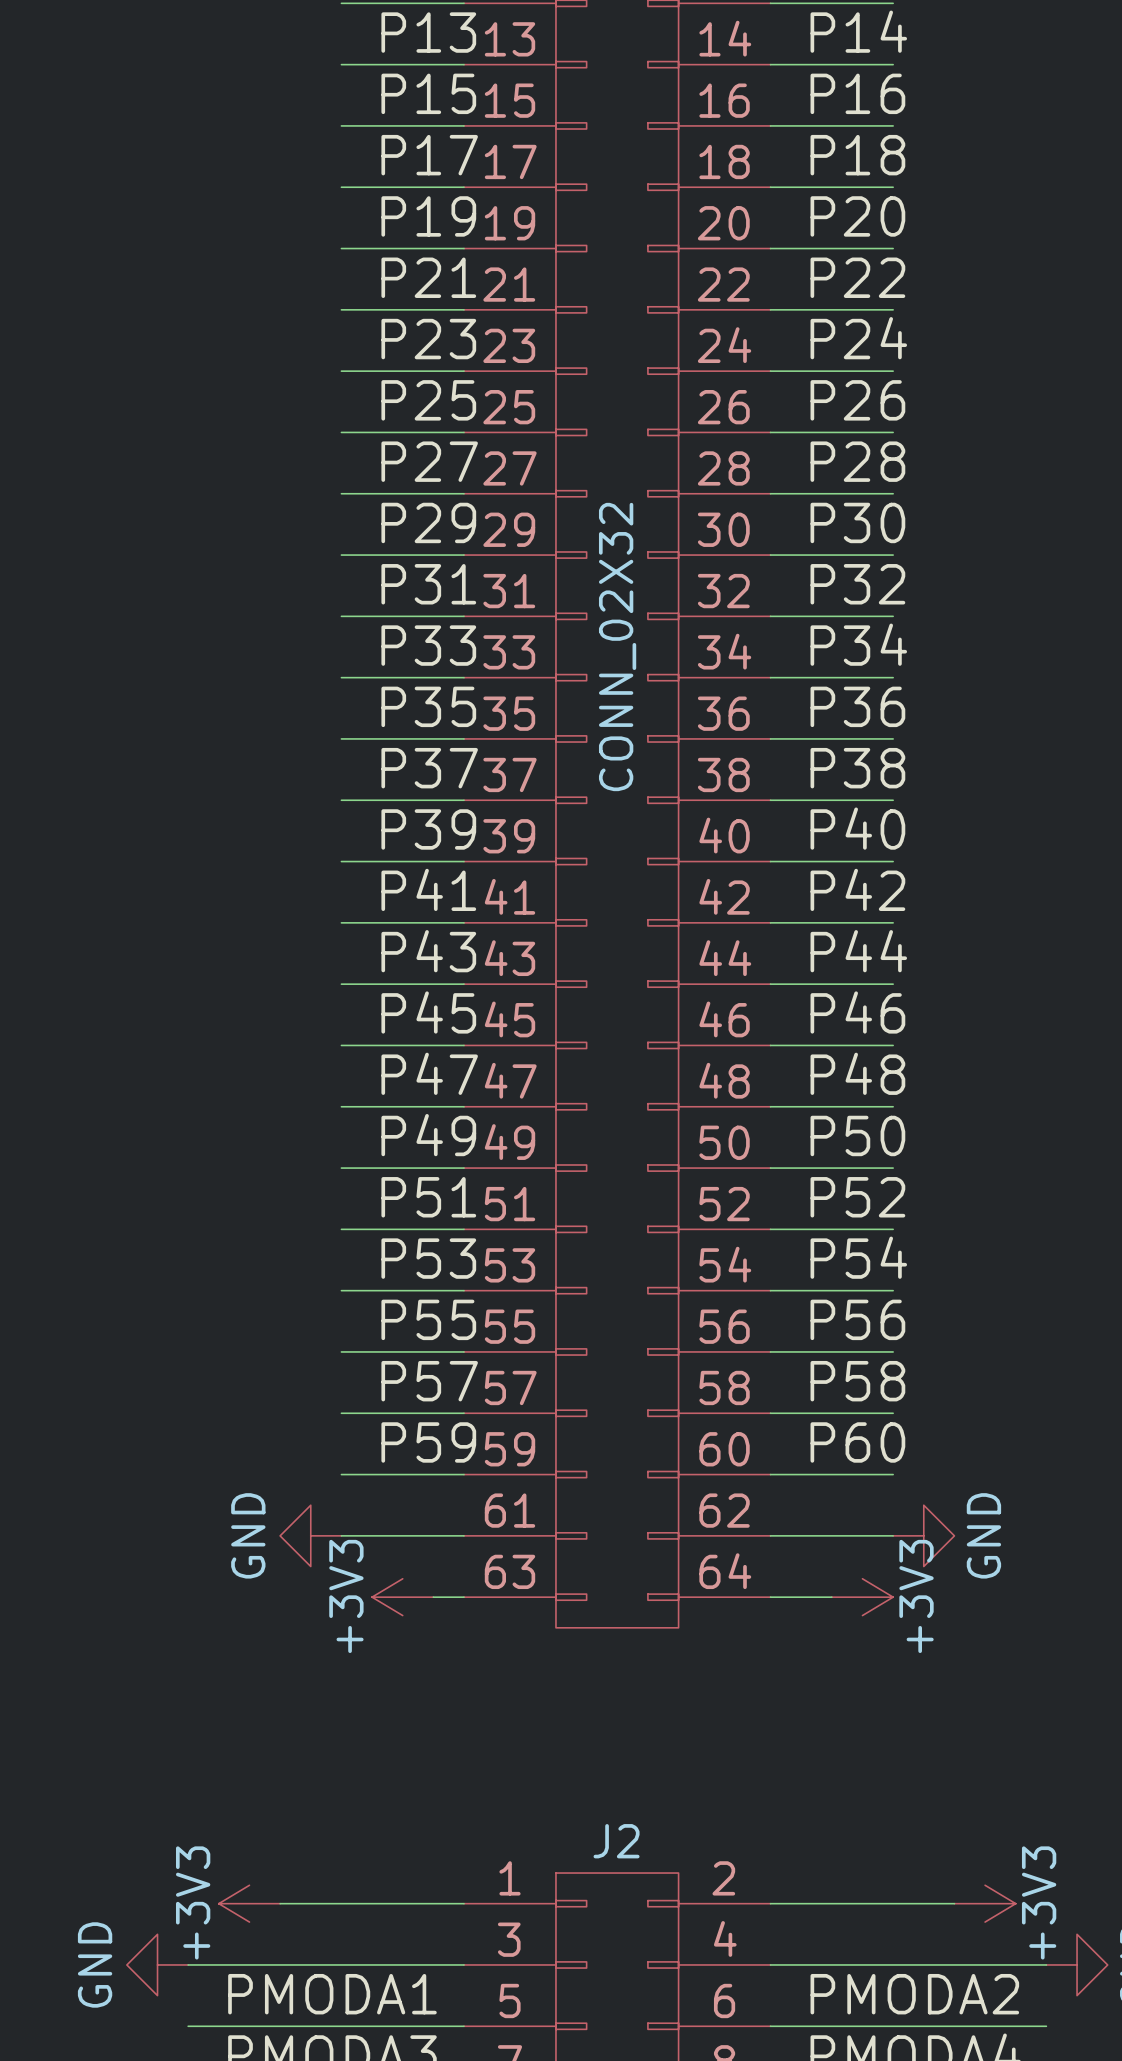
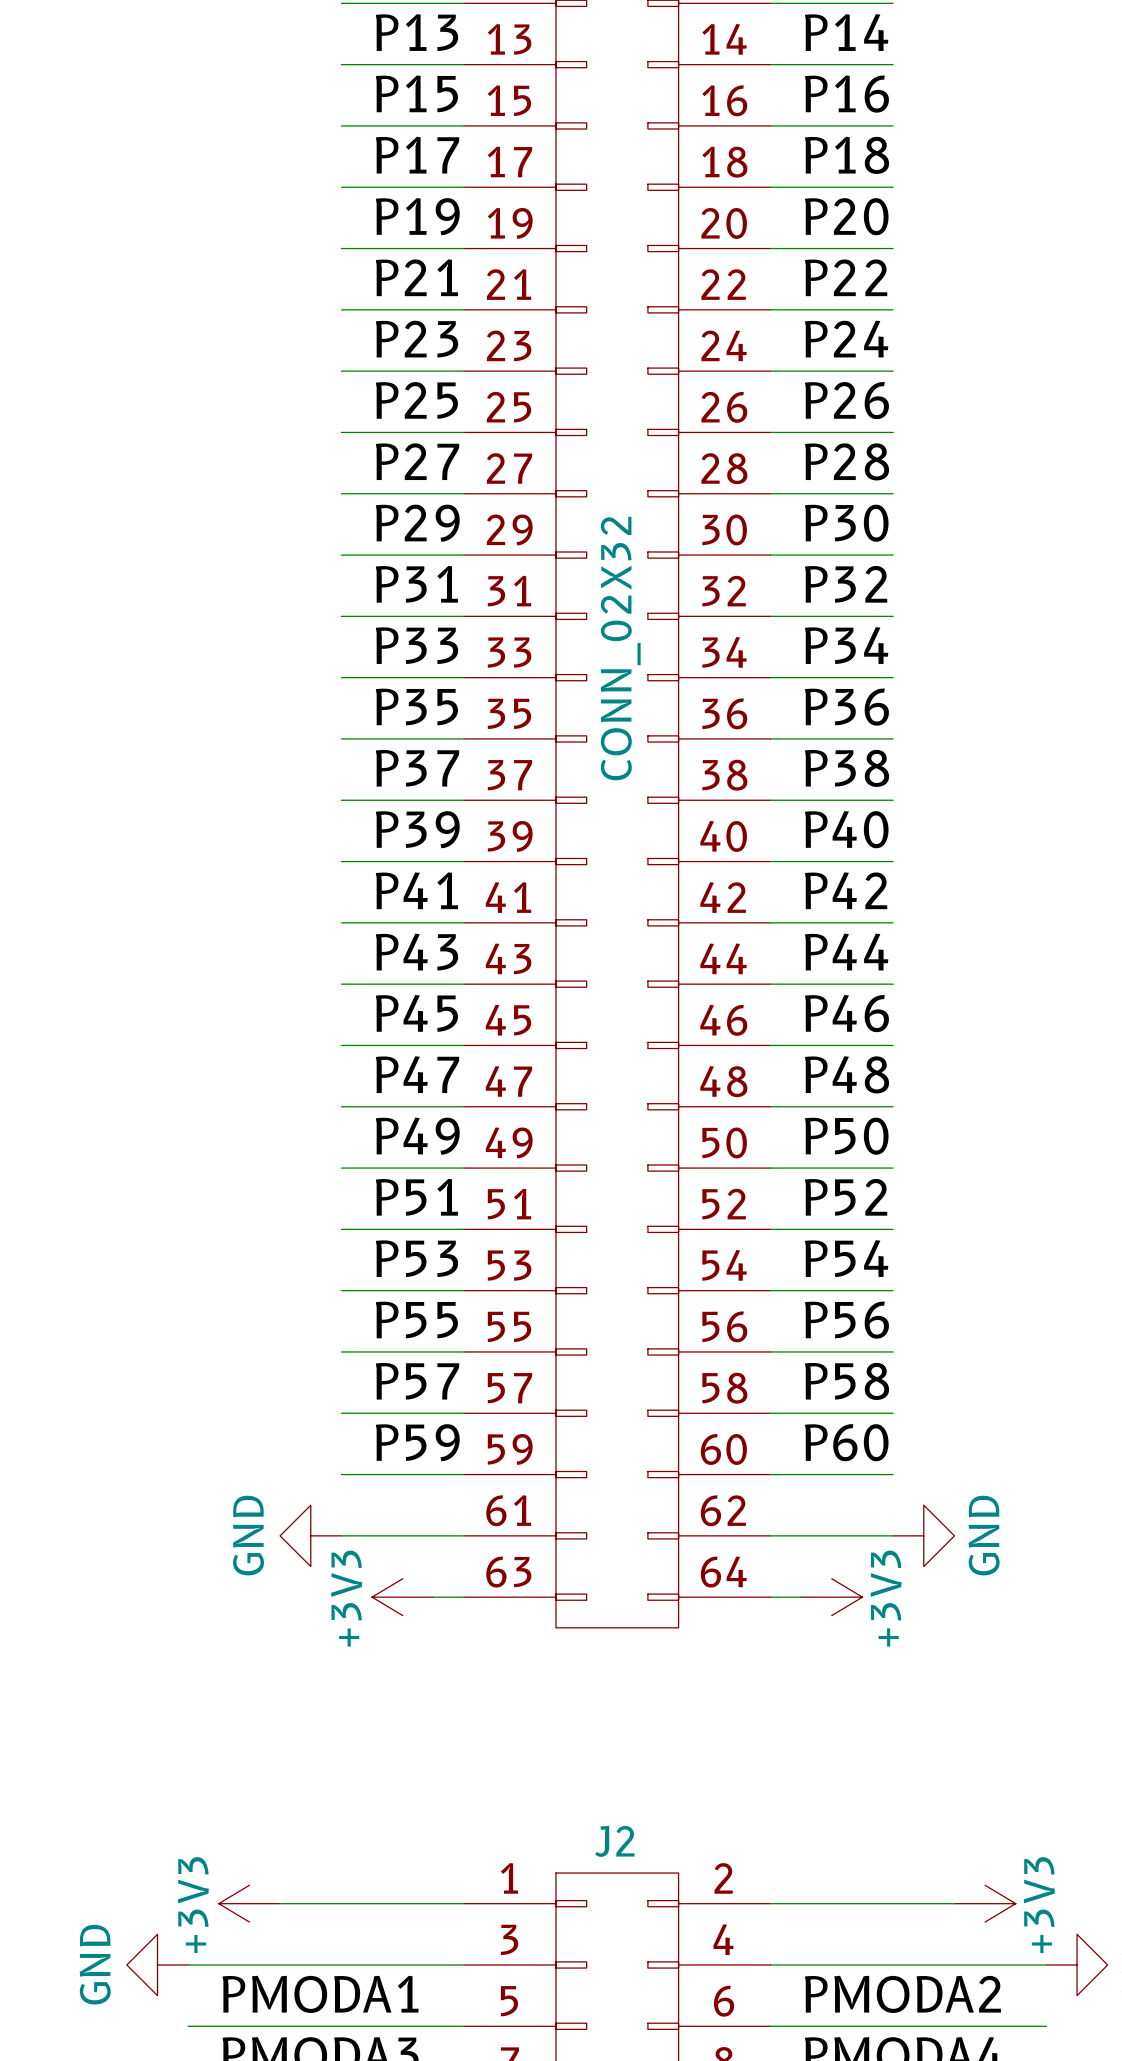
power symbol position: +3V3 (862, 1597) -> +3V3 (831, 1597)

